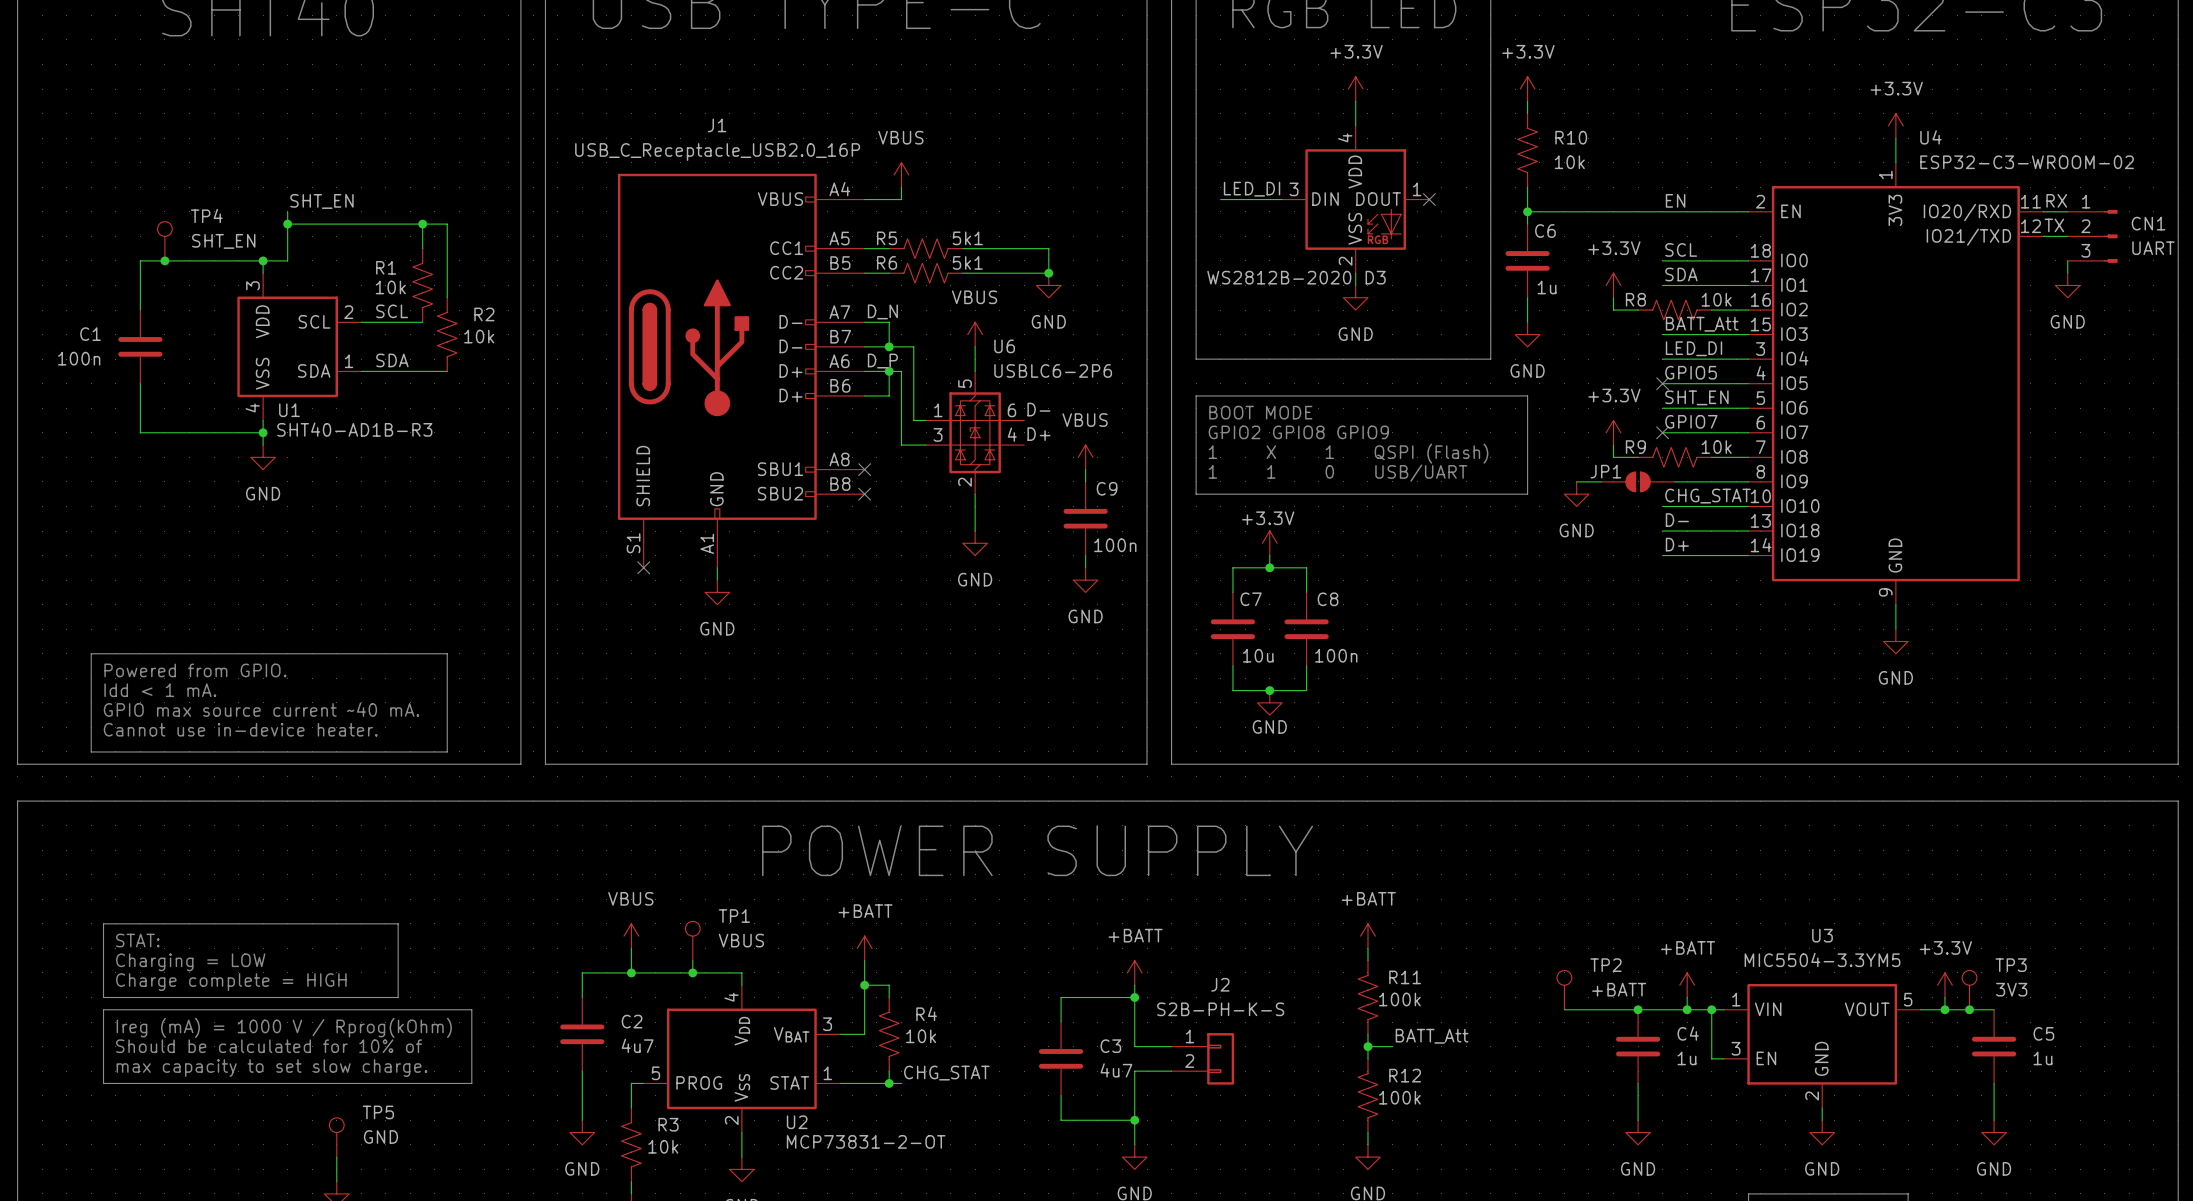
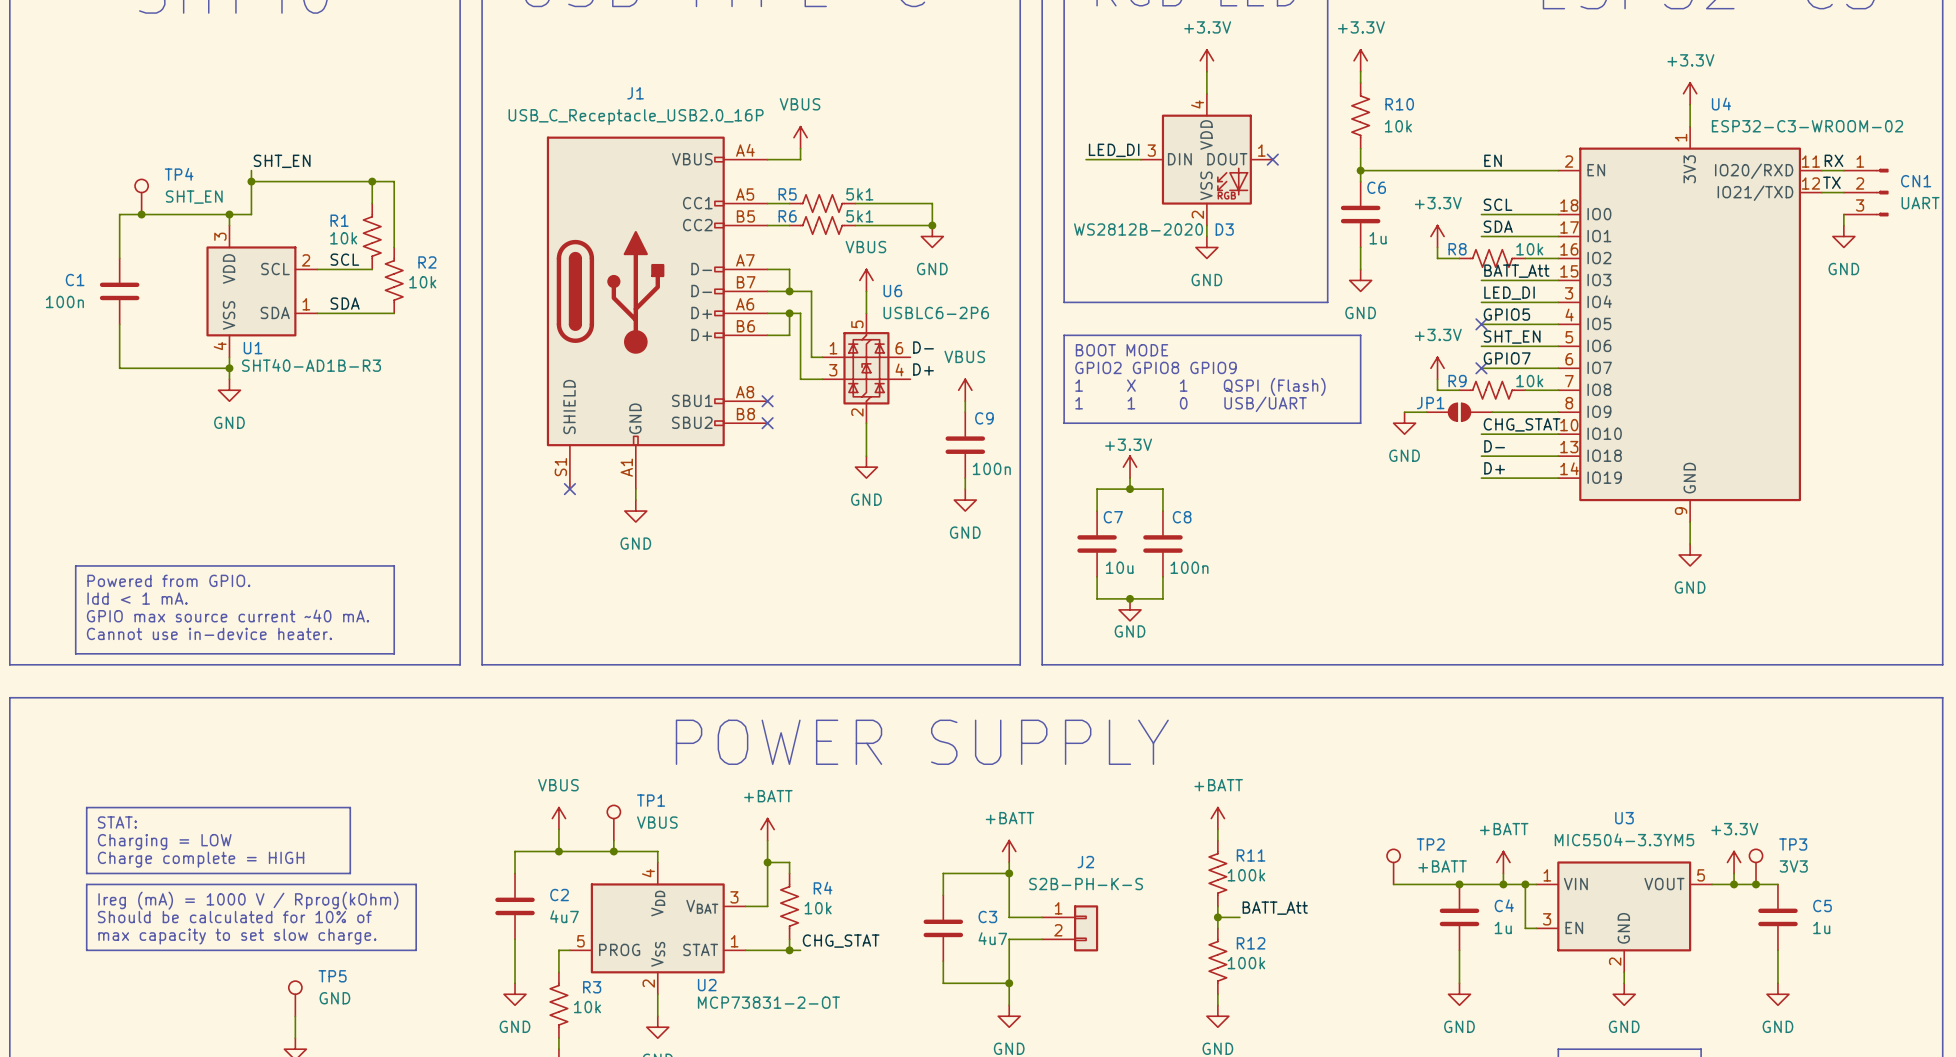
label: D_N (882, 311) -> none
label: D_P (882, 361) -> none

